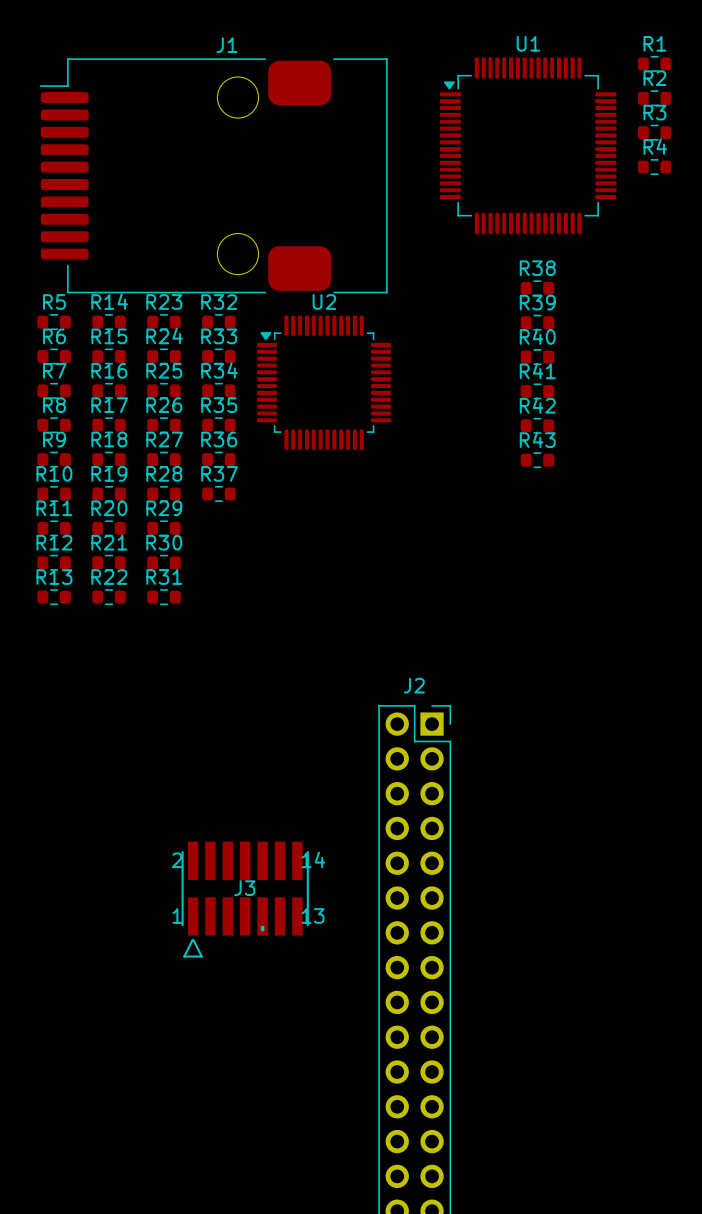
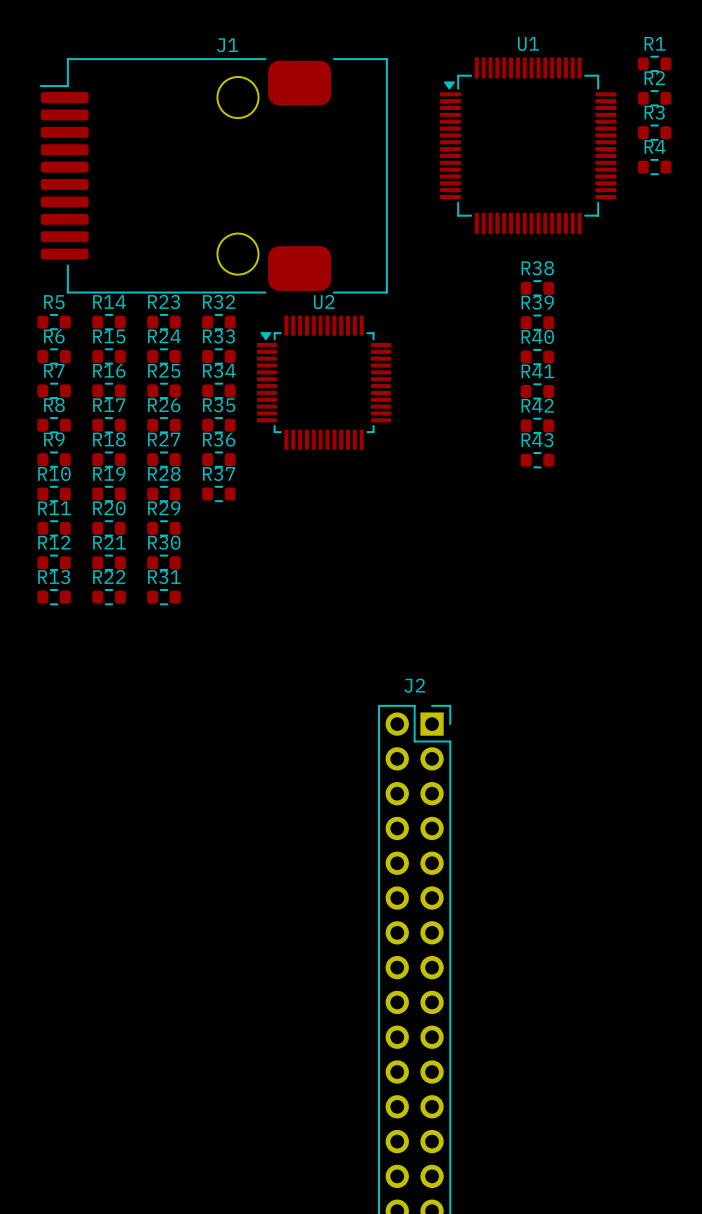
J3: (245, 899) -> none

